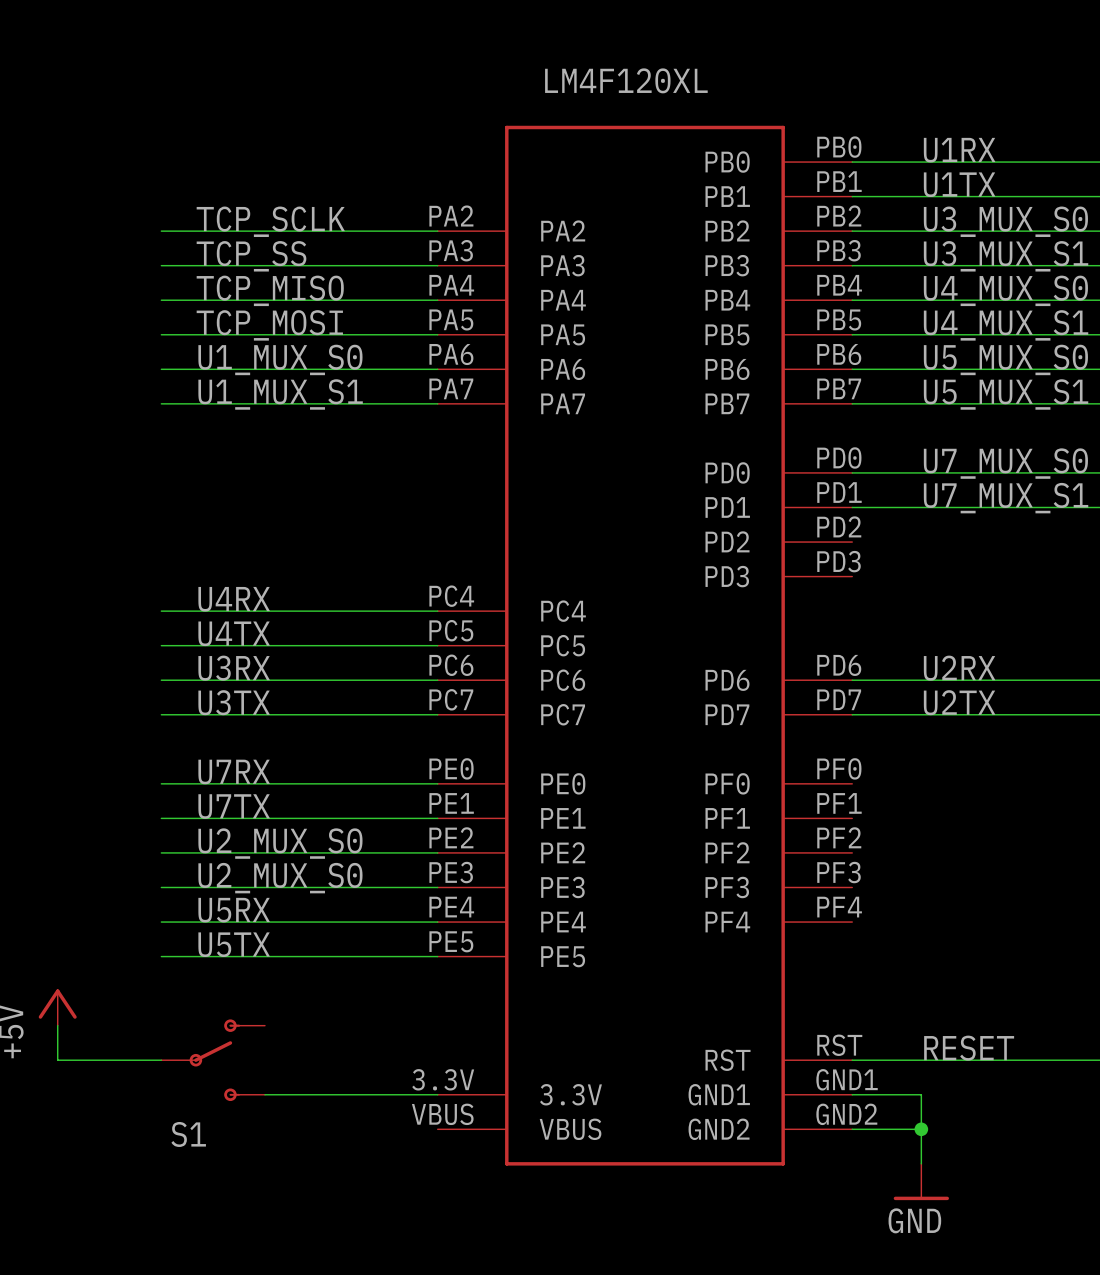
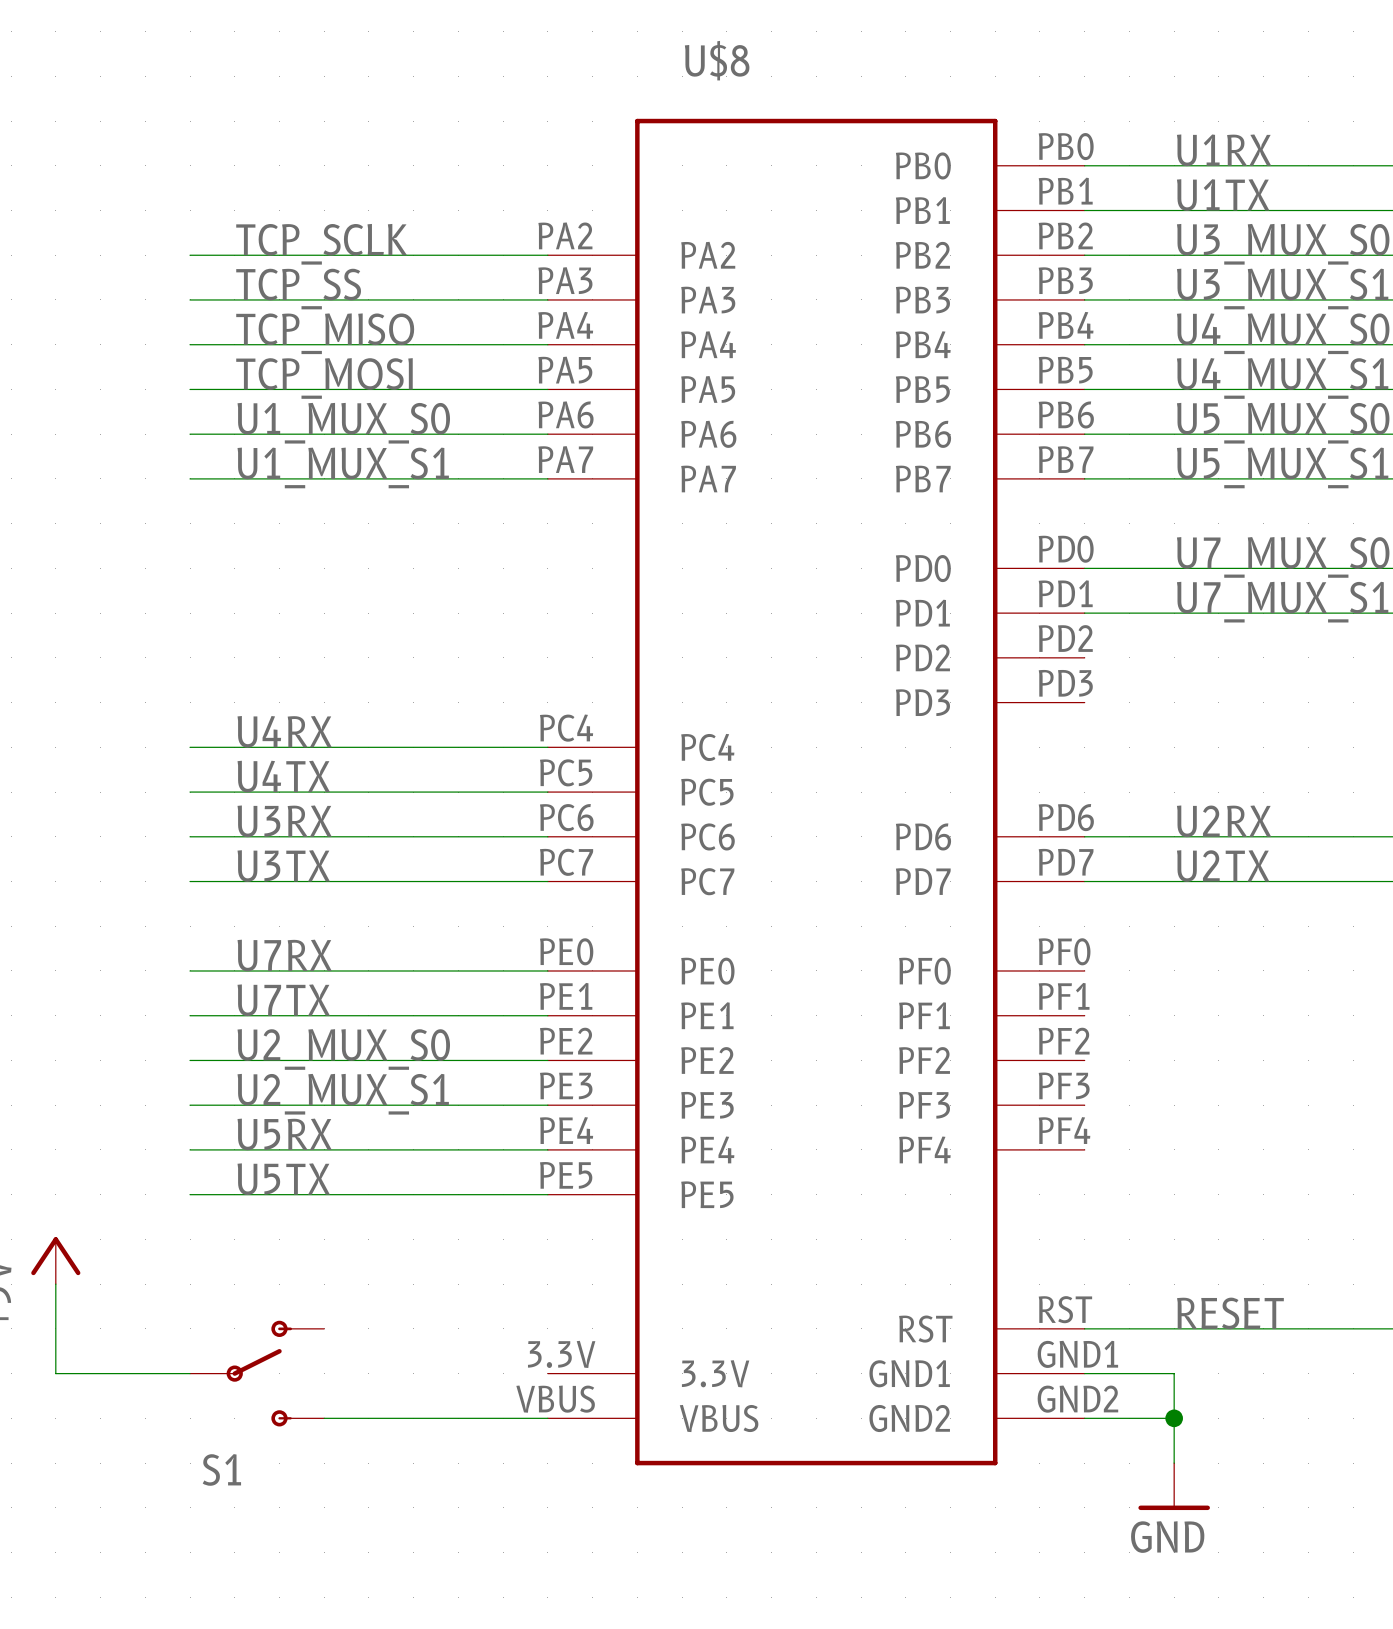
LM4F120XL name: LM4F120XL (626, 80) -> U$8 (717, 60)
label: U2_MUX_S0 (280, 878) -> U2_MUX_S1 (343, 1094)
wire: (57, 1060) (161, 1060) -> (55, 1328) (55, 1373) (190, 1373)
S1 position: (213, 1060) -> (257, 1373)
wire: (264, 1094) (437, 1094) -> (324, 1418) (547, 1418)

